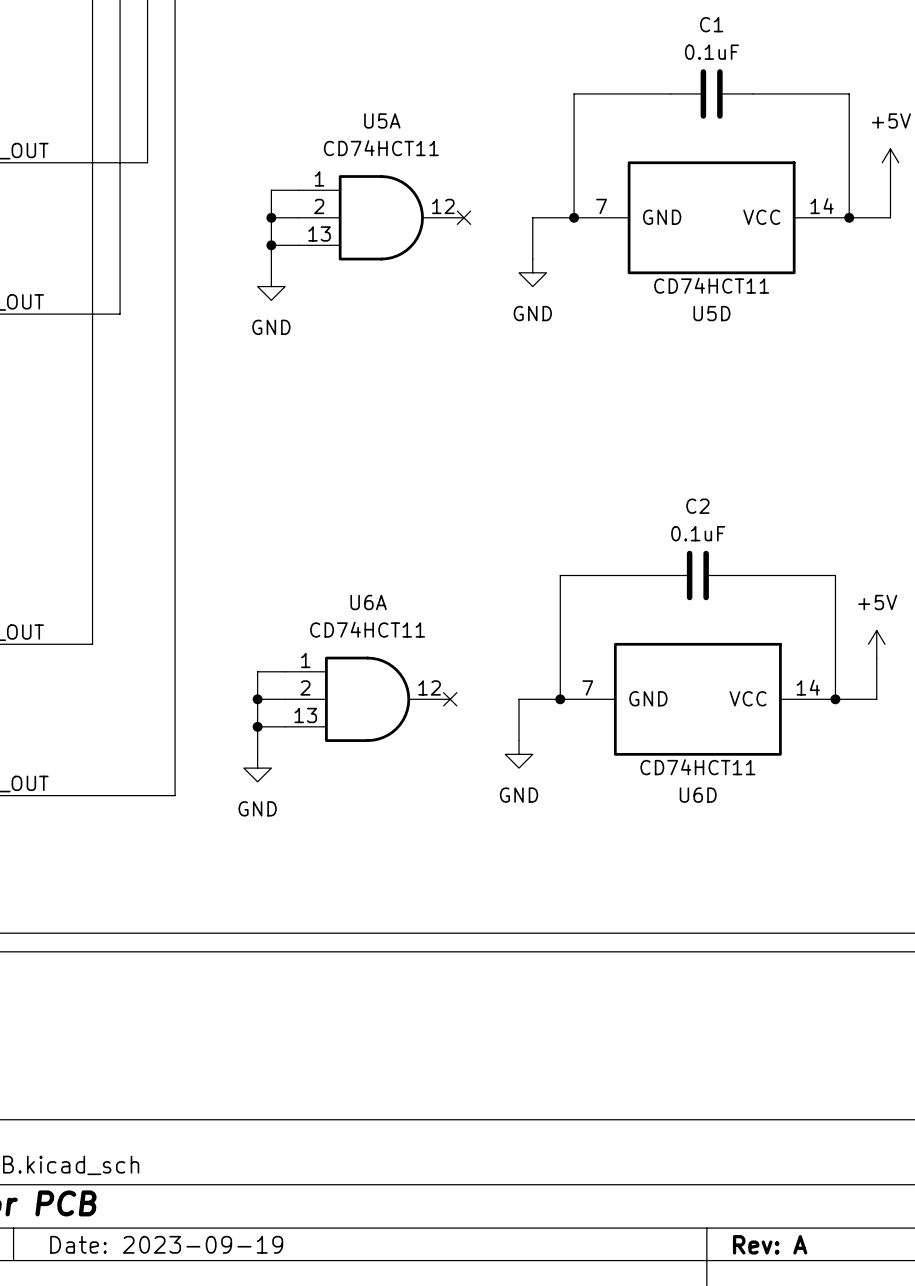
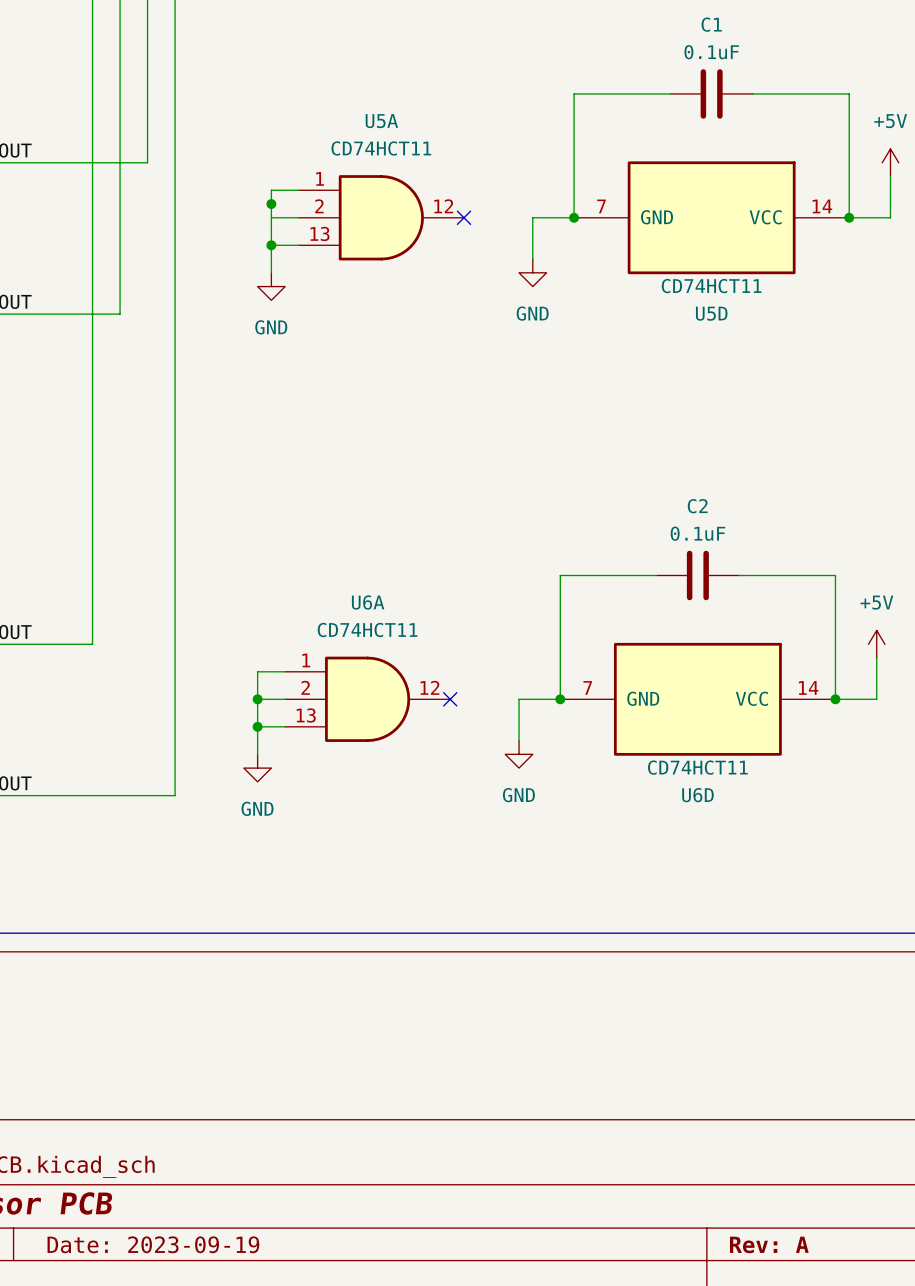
junction position: (271, 217) -> (271, 204)

